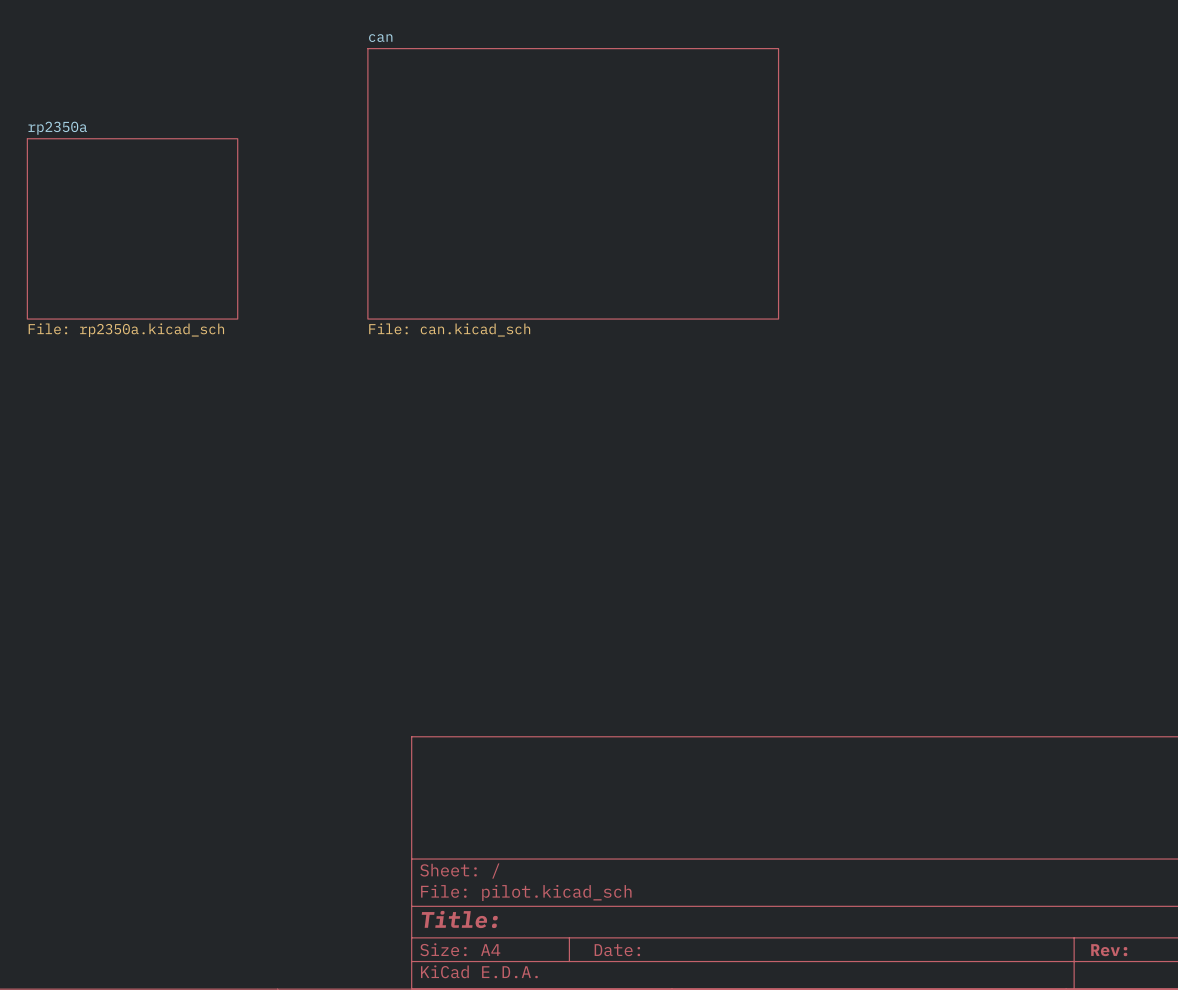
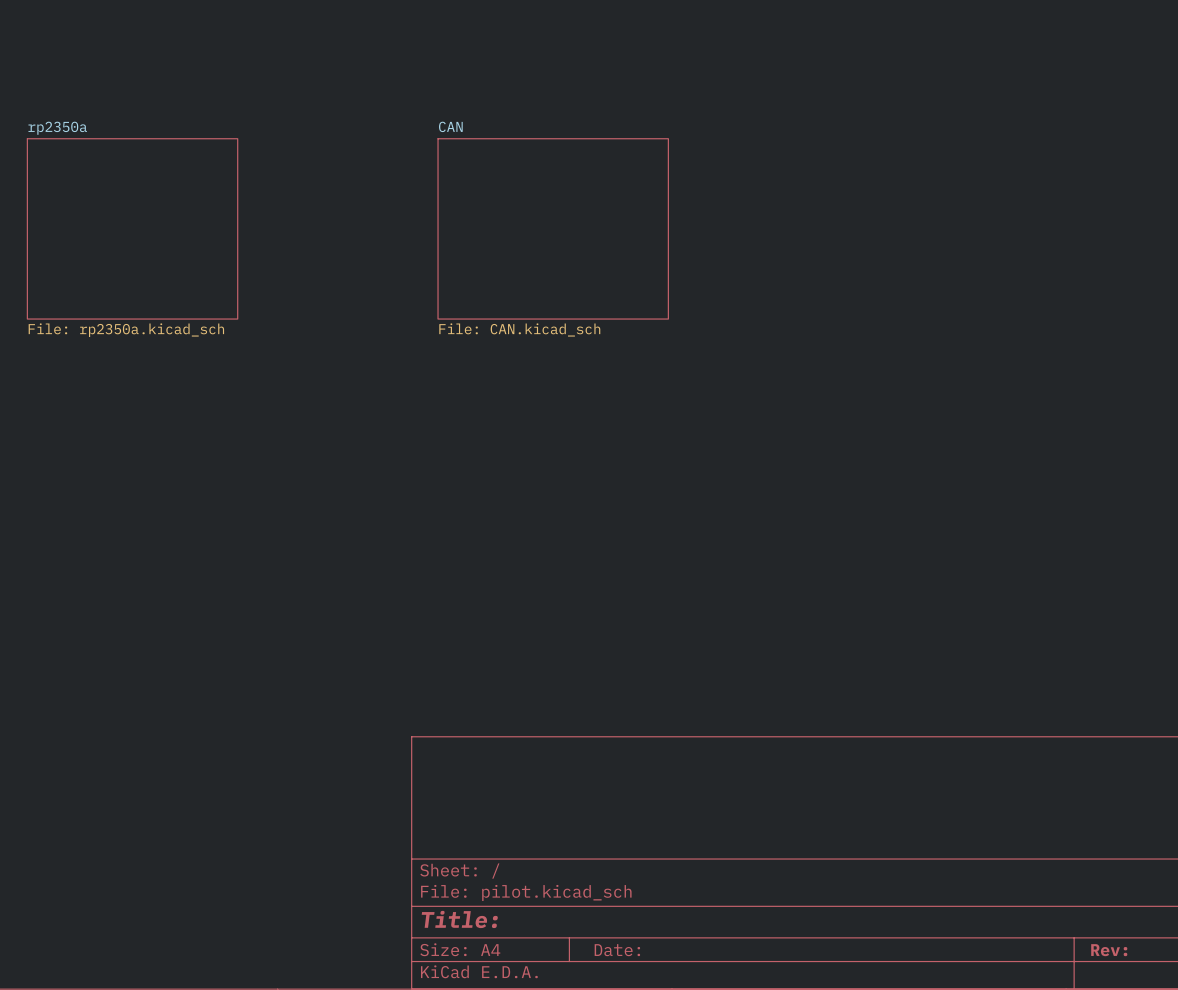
sheet can: File: can.kicad_sch (573, 183) -> none
sheet CAN: none -> File: CAN.kicad_sch (553, 228)

